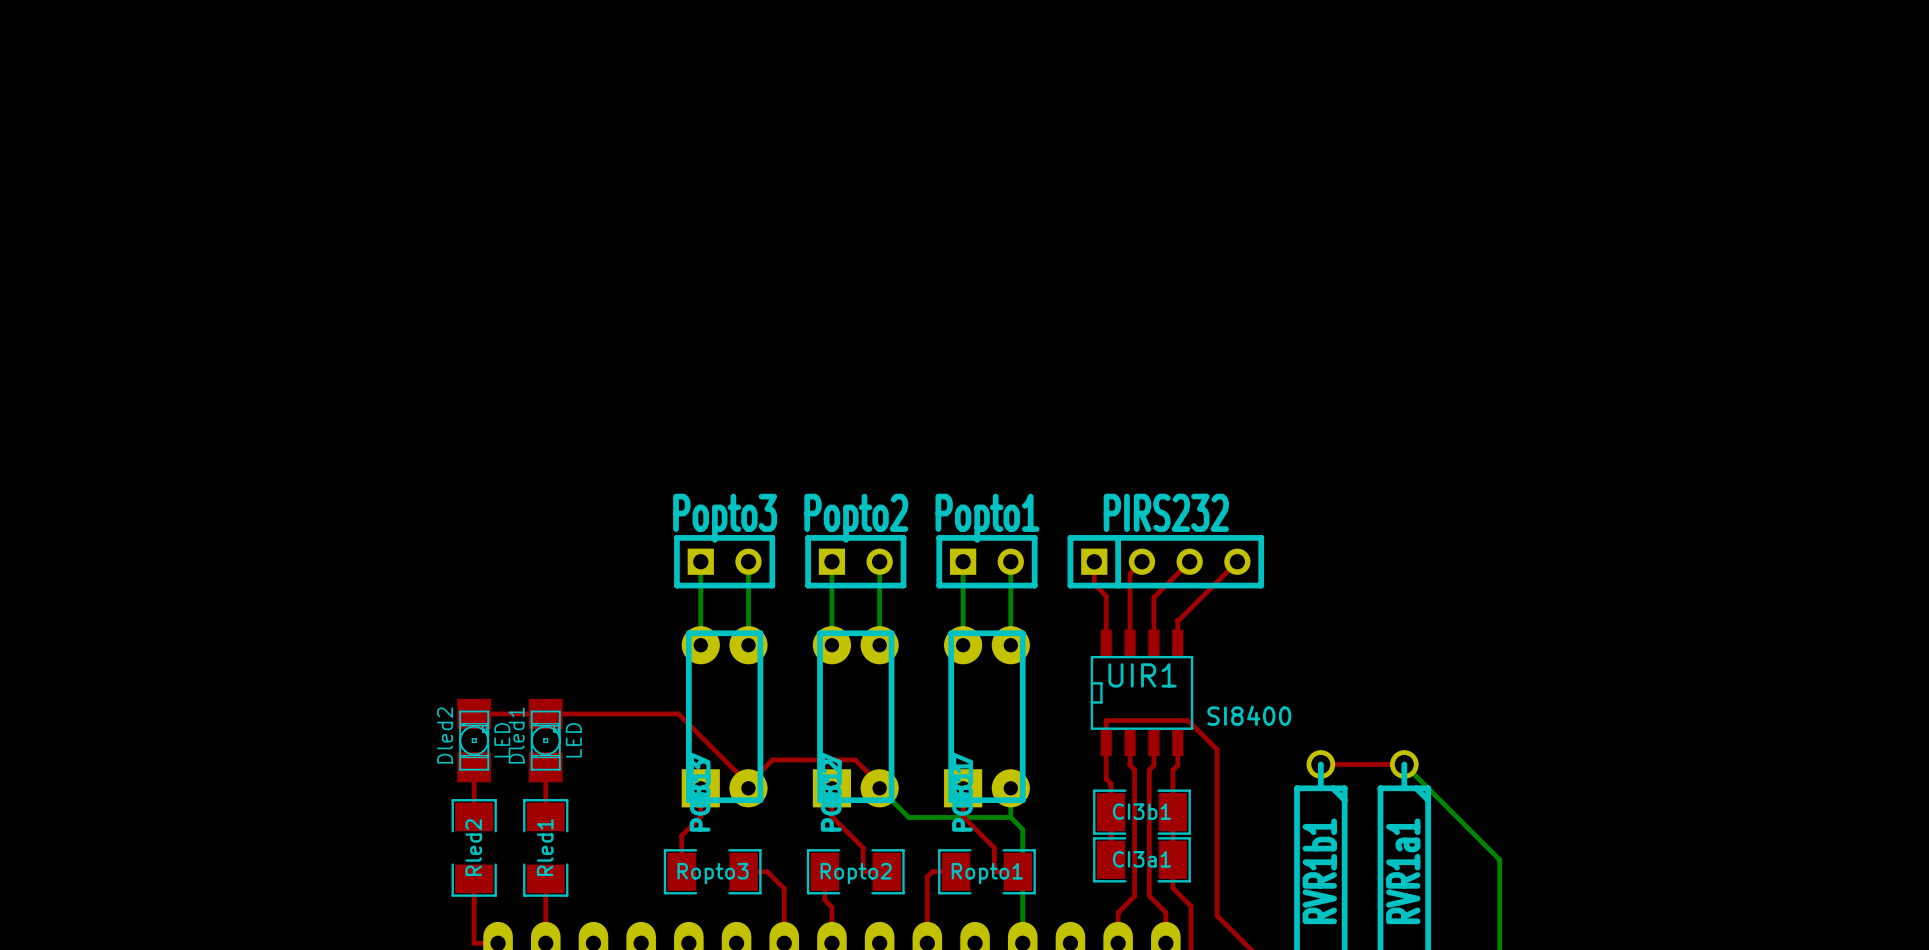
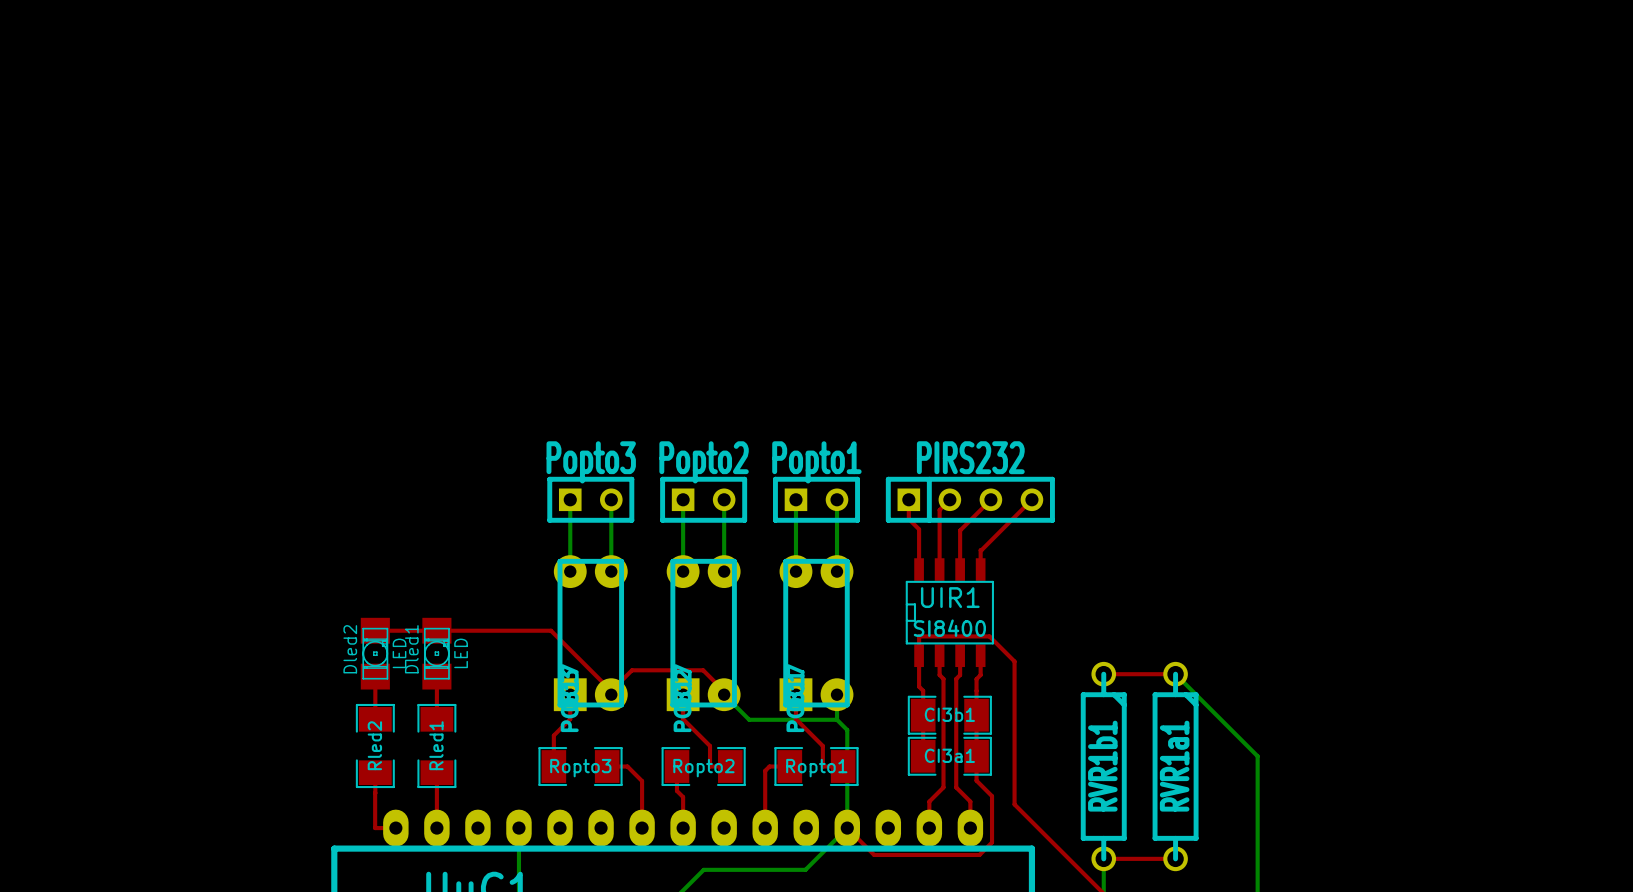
UIR1 value position: SI8400 (1249, 715) -> SI8400 (949, 628)

